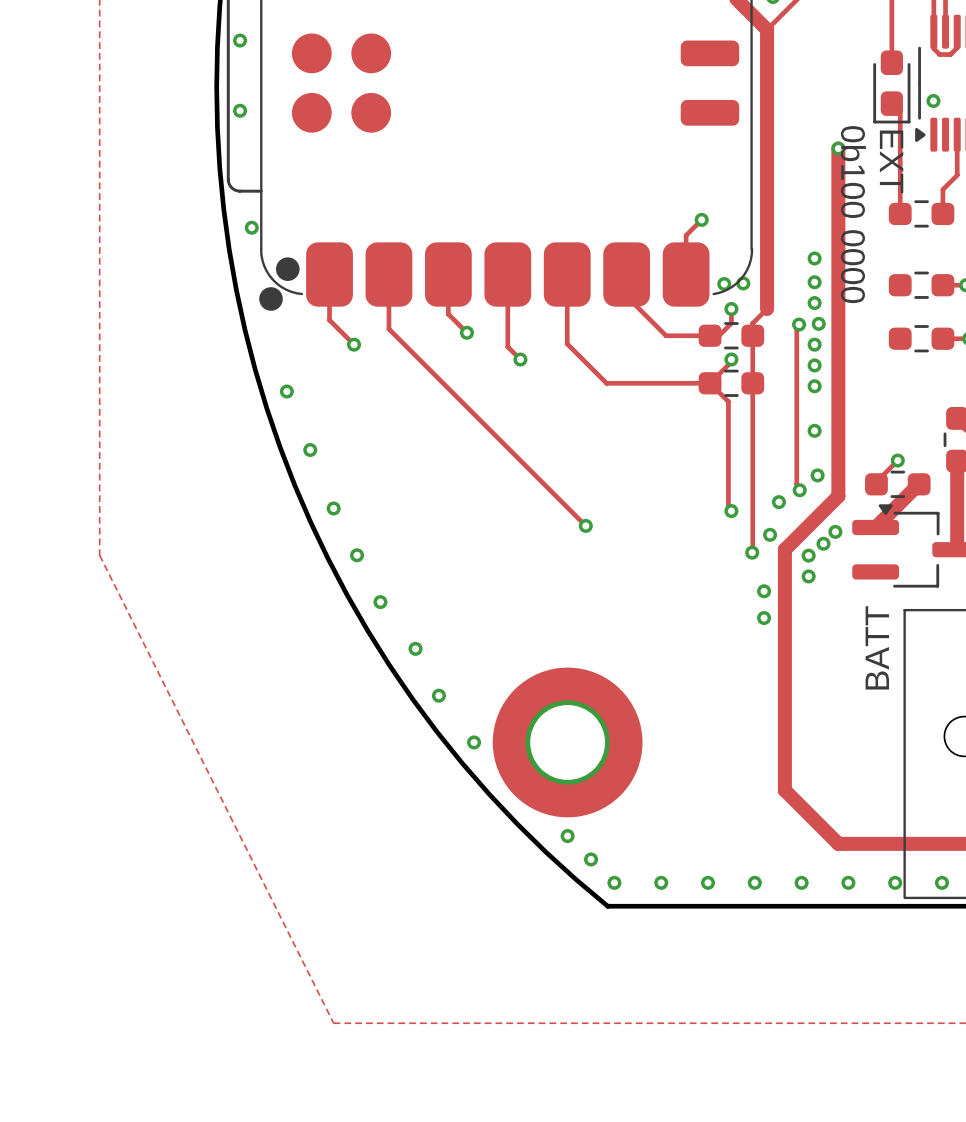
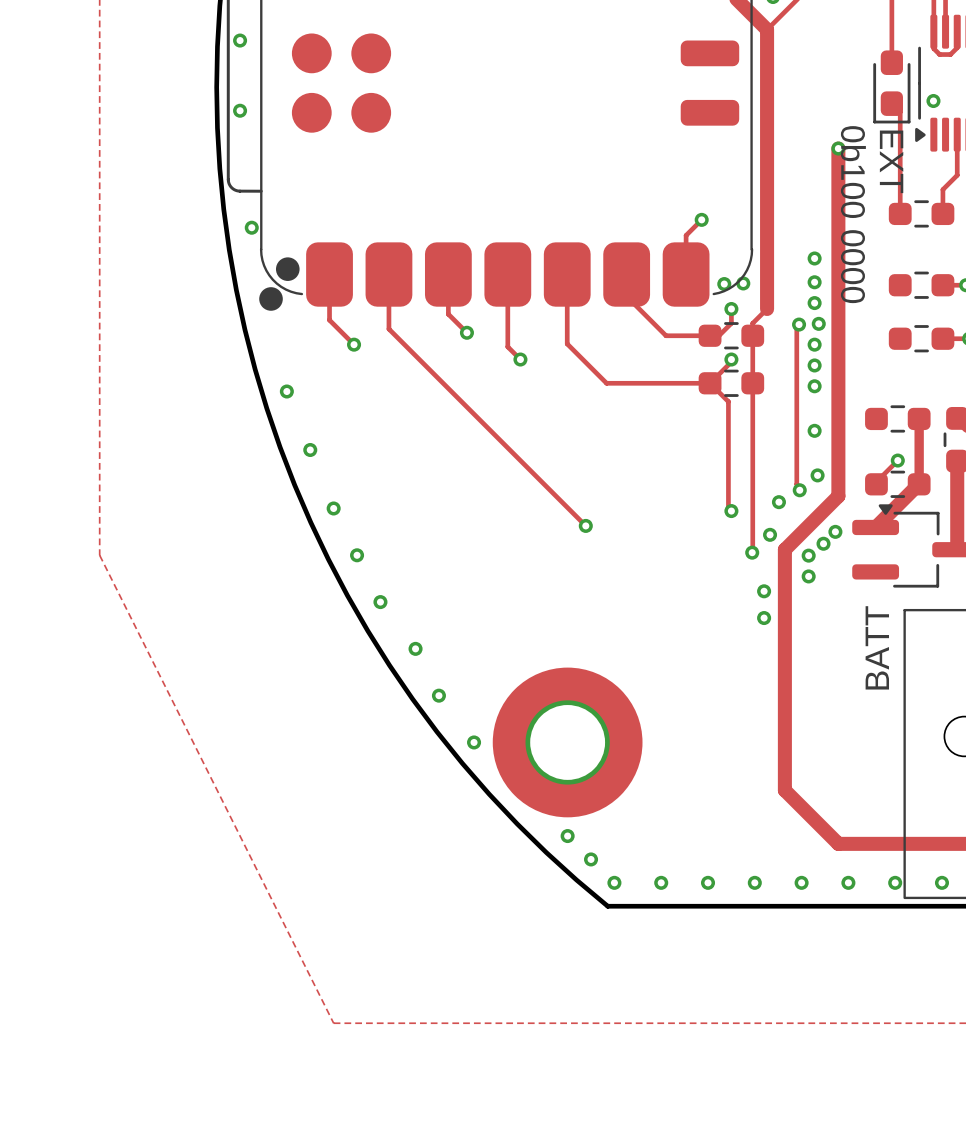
part: none -> (897, 418)
track: none -> (919, 418) (919, 484)

